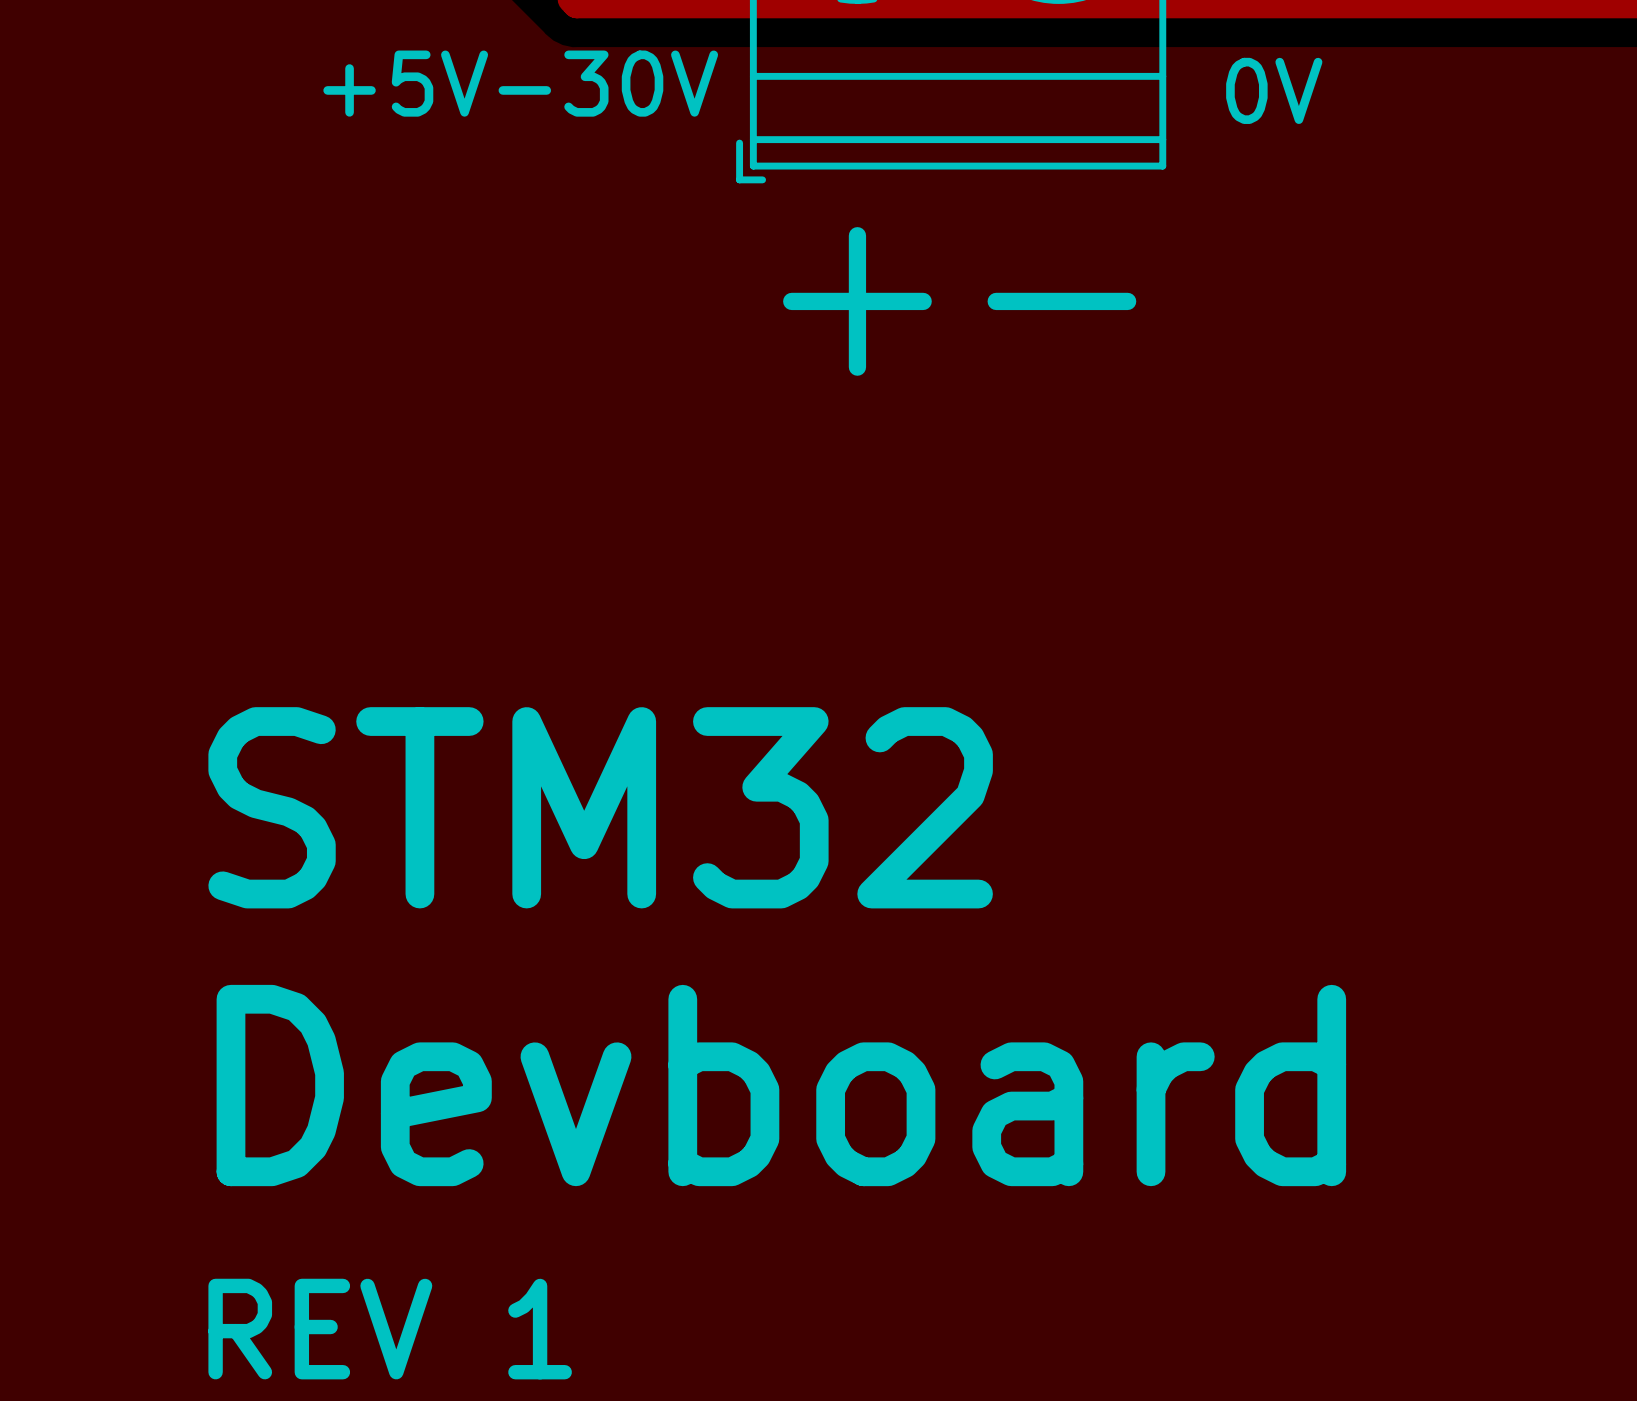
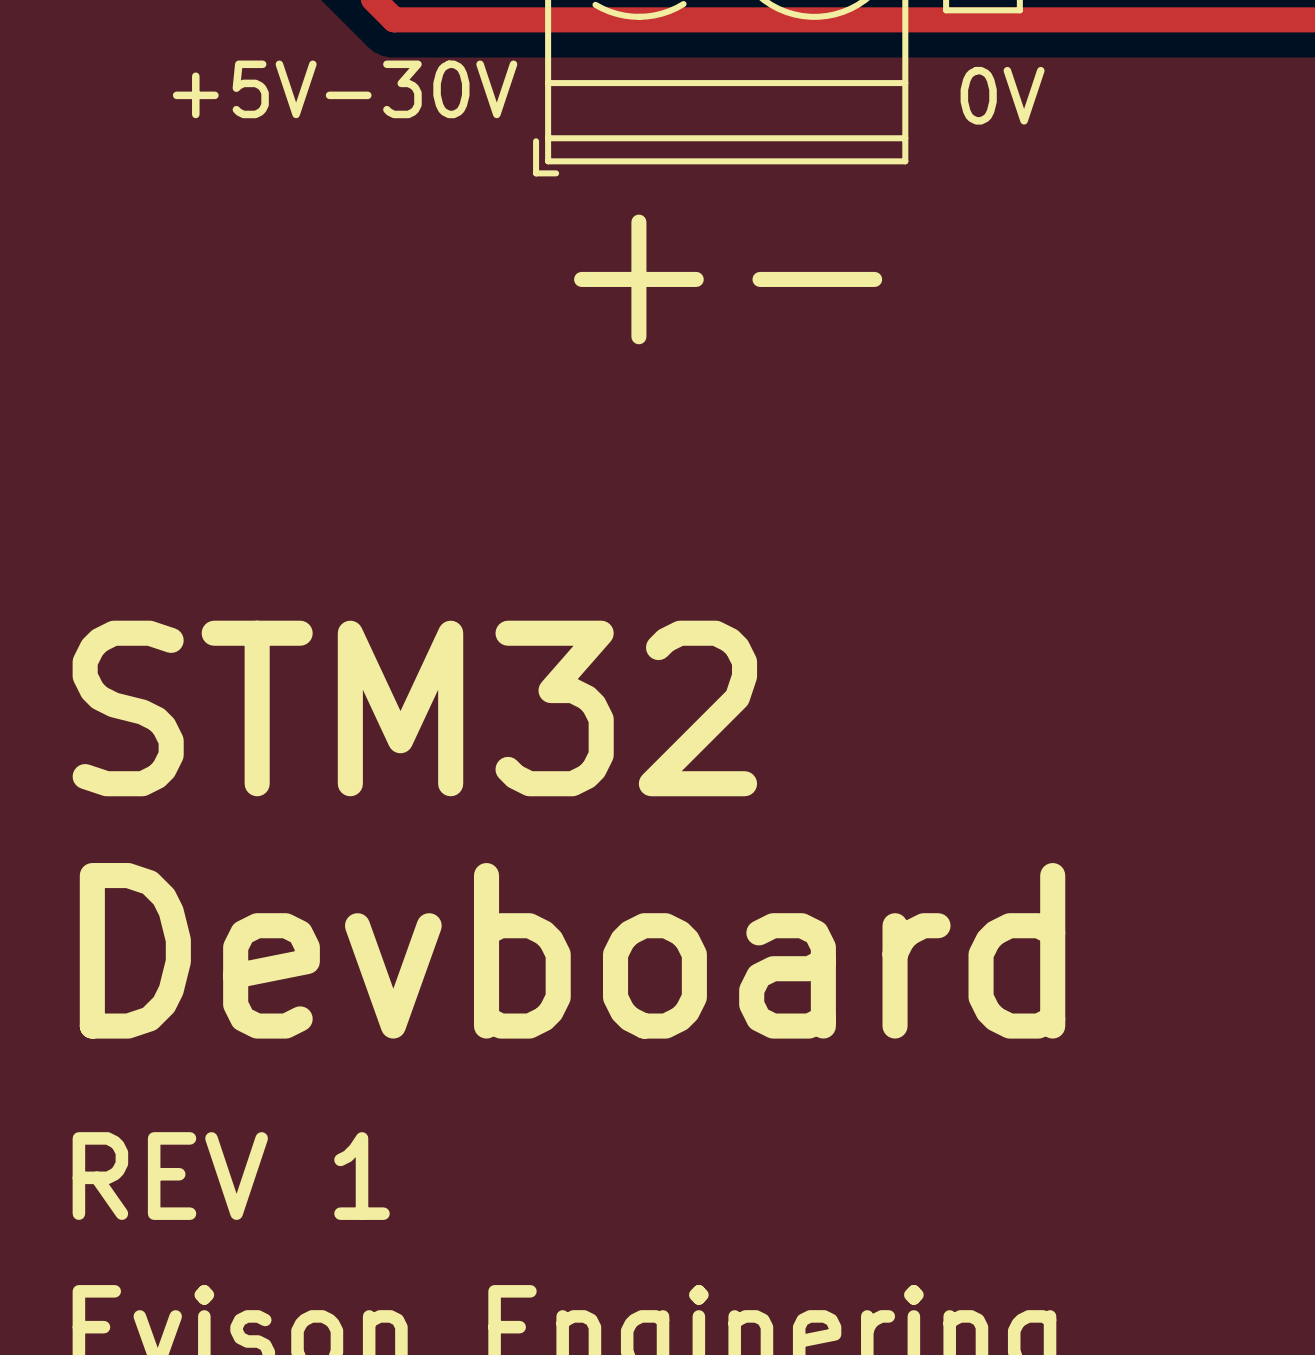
text position: STM32 (600, 807) -> STM32 (414, 708)
text position: Devboard (781, 1085) -> Devboard (572, 950)

